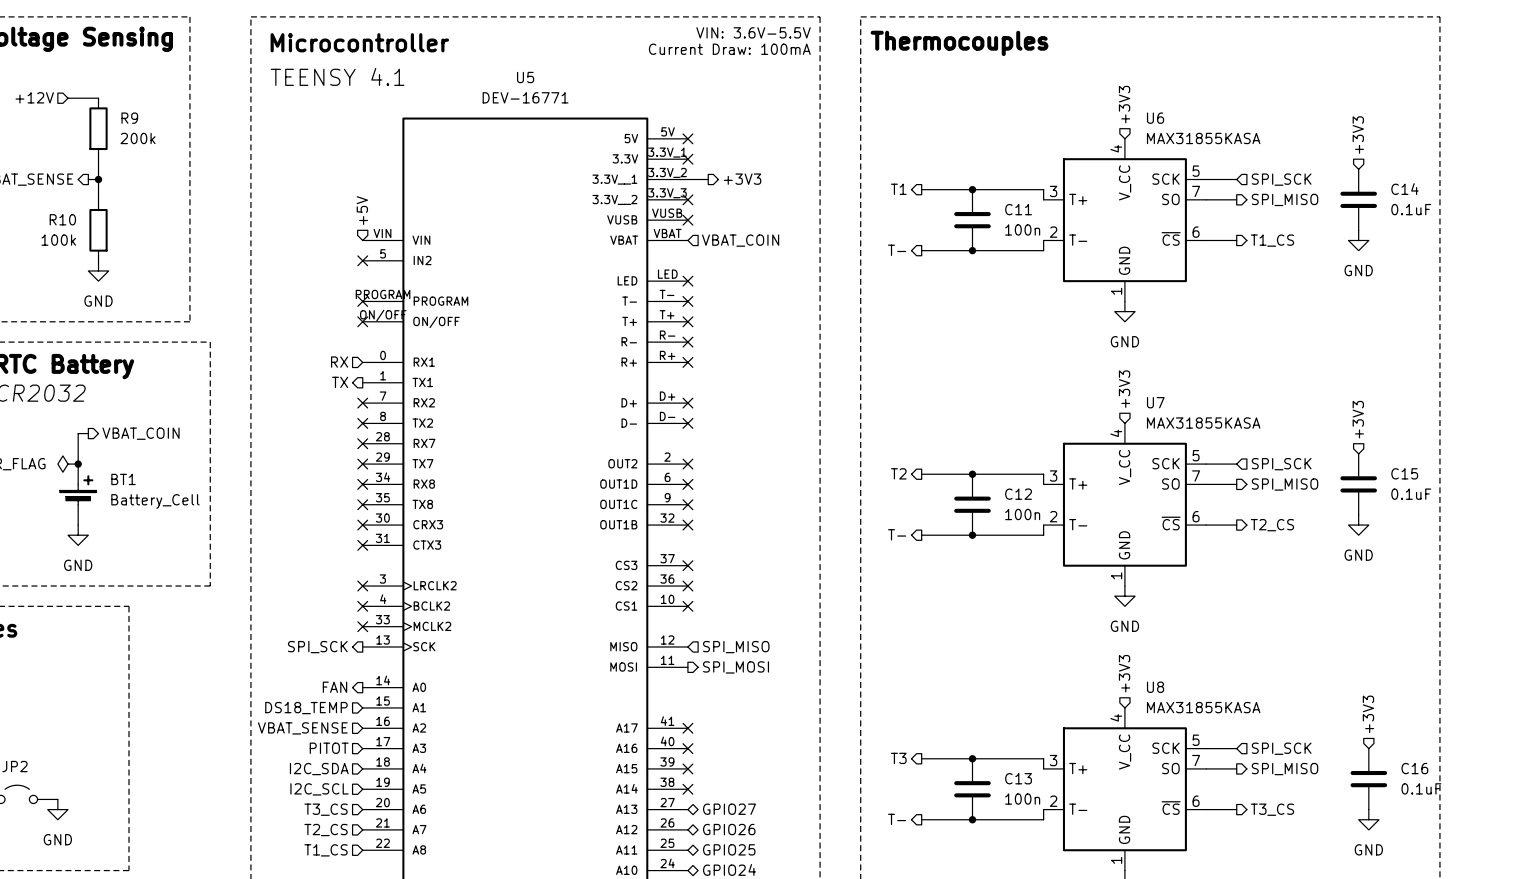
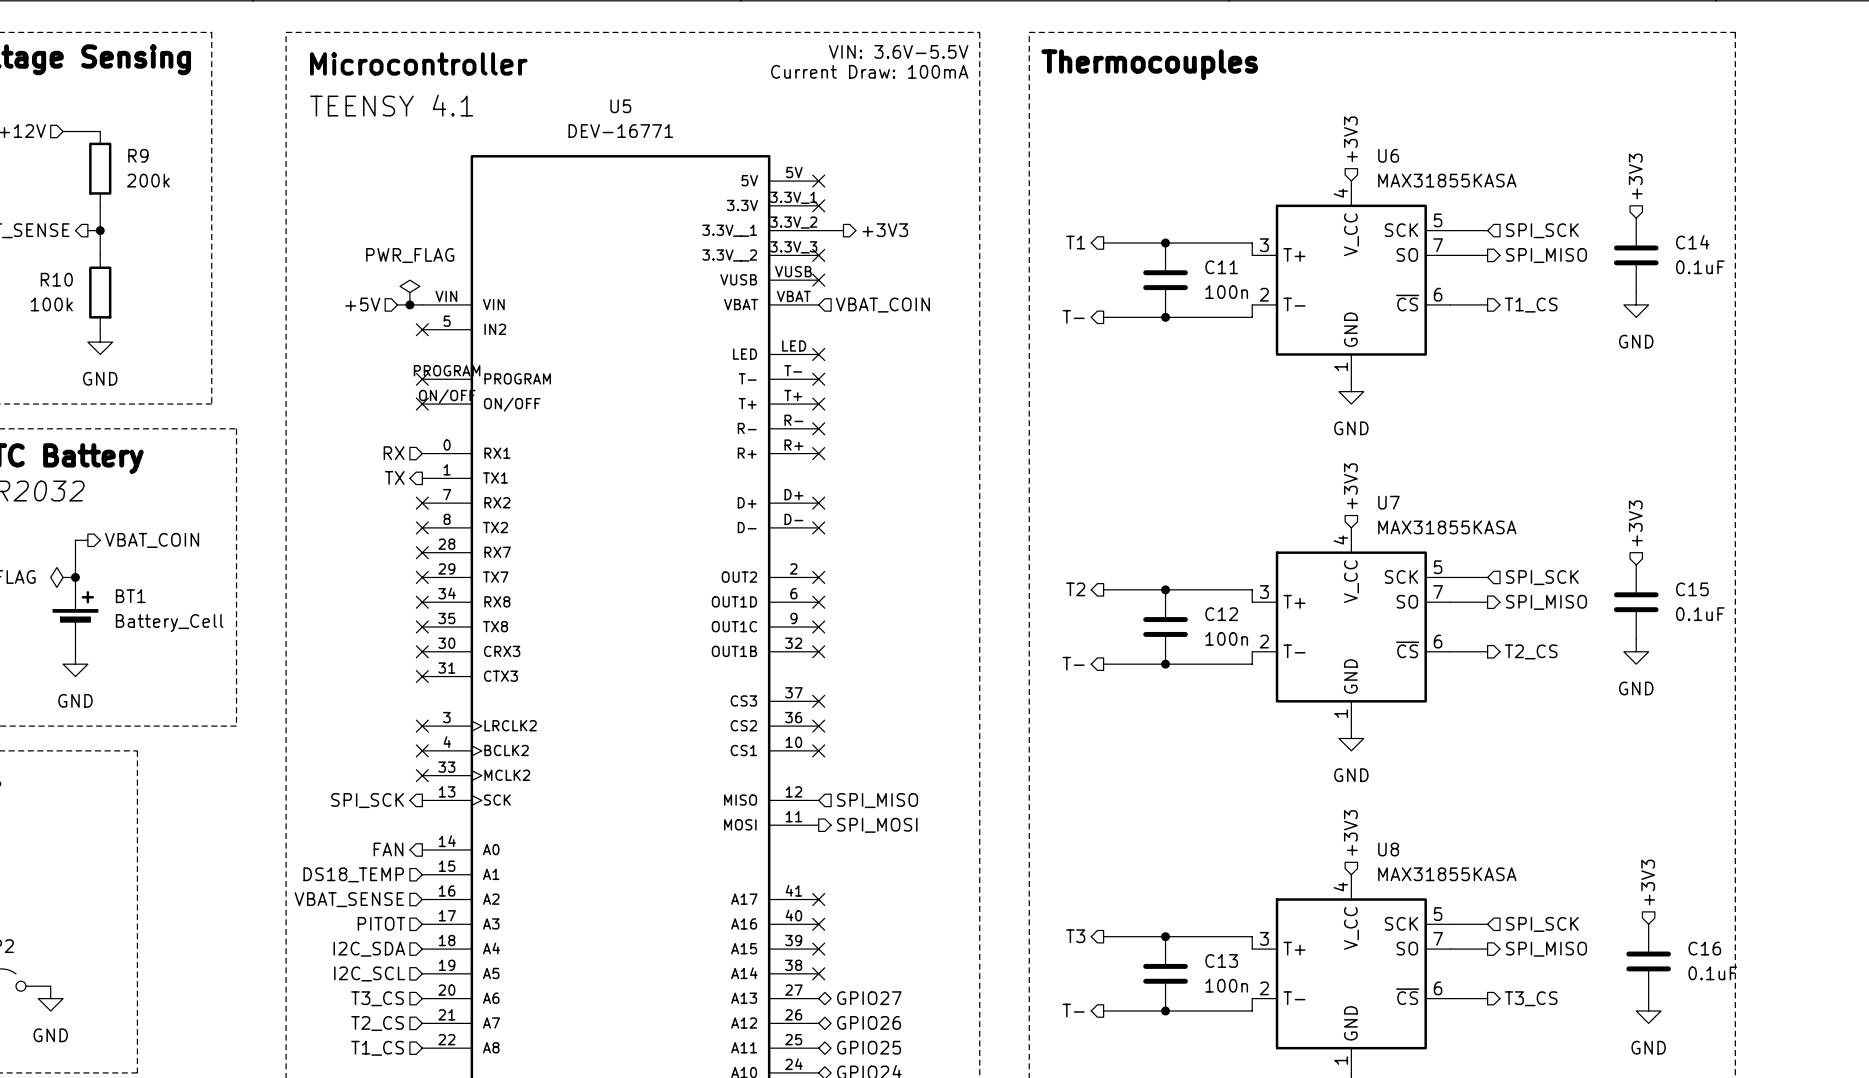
hierarchical label rotation: 0° (362, 210) -> 90° counterclockwise (362, 304)
hierarchical label position: +5V (362, 210) -> +5V (362, 304)
power symbol: none -> PWR_FLAG (409, 292)
wire: none -> (397, 304) (422, 304)
junction: none -> (409, 304)

